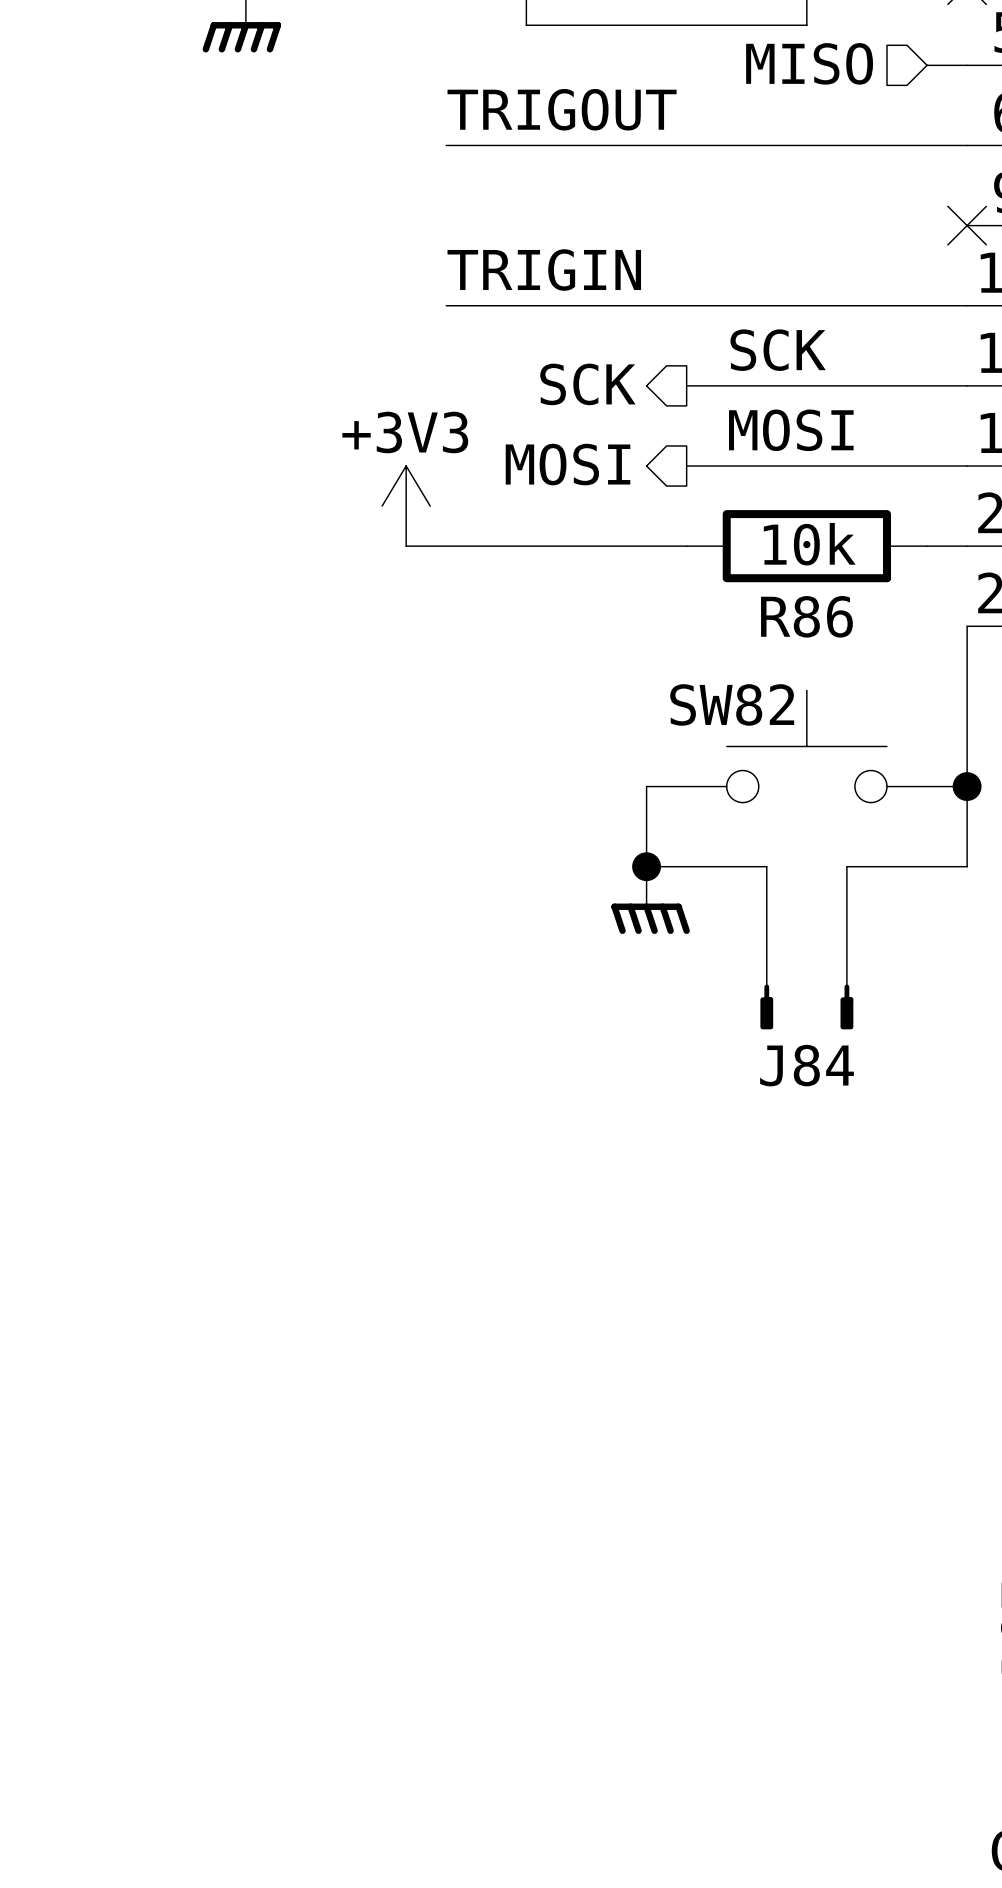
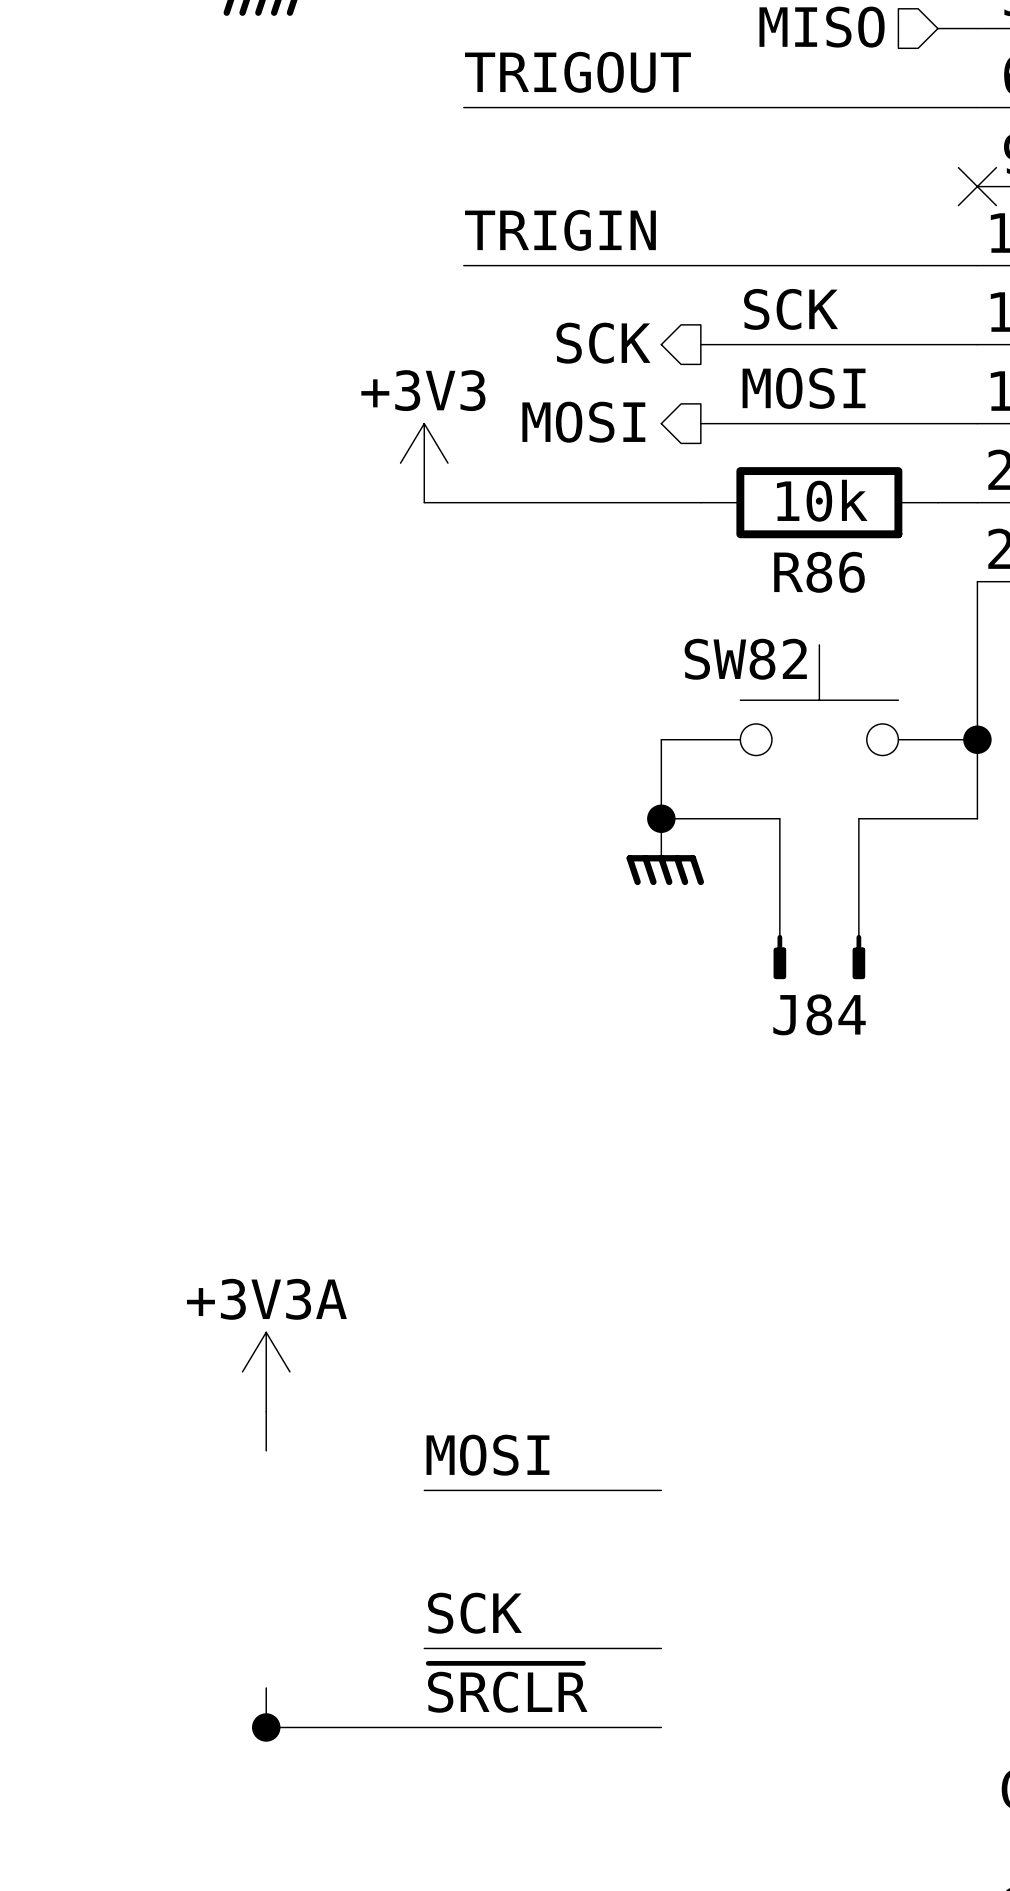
power symbol: none -> +3V3A (266, 1371)
wire: none -> (266, 1411) (266, 1450)
label: none -> MOSI (487, 1455)
wire: none -> (424, 1490) (661, 1490)
label: none -> SCK (474, 1613)
wire: none -> (424, 1648) (661, 1648)
wire: none -> (266, 1687) (266, 1727) (661, 1727)
label: none -> ~{SRCLR} (507, 1688)
junction: none -> (266, 1727)

